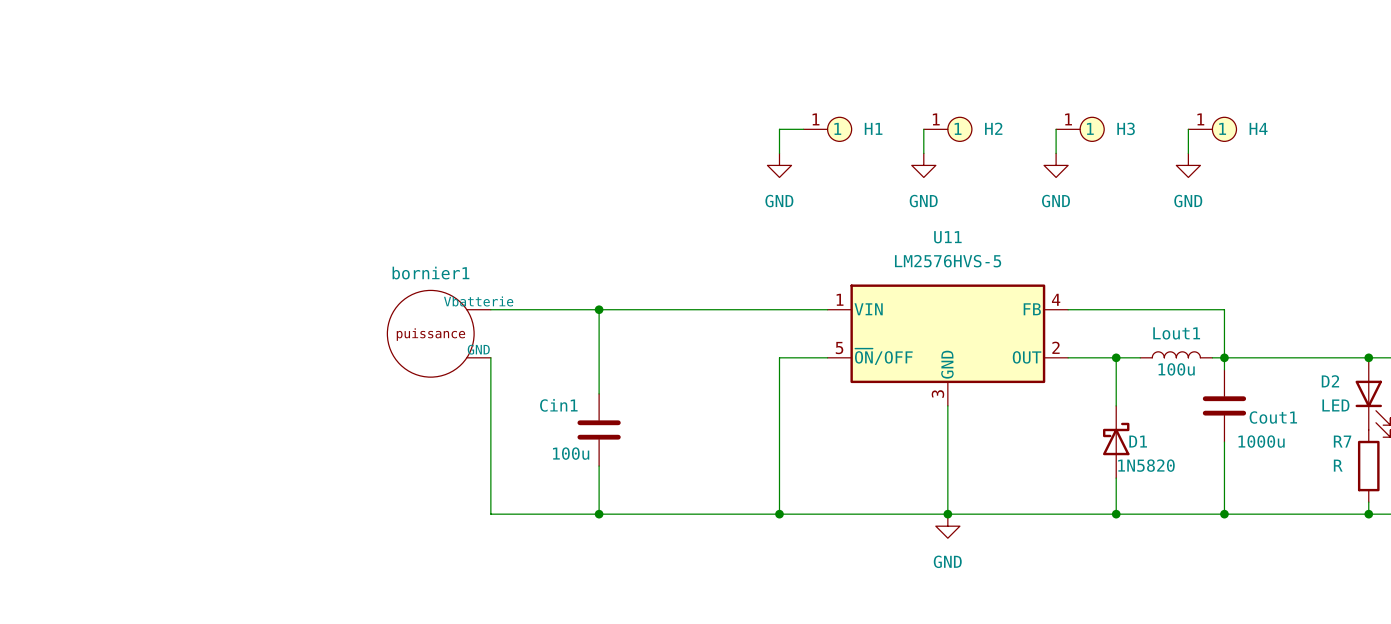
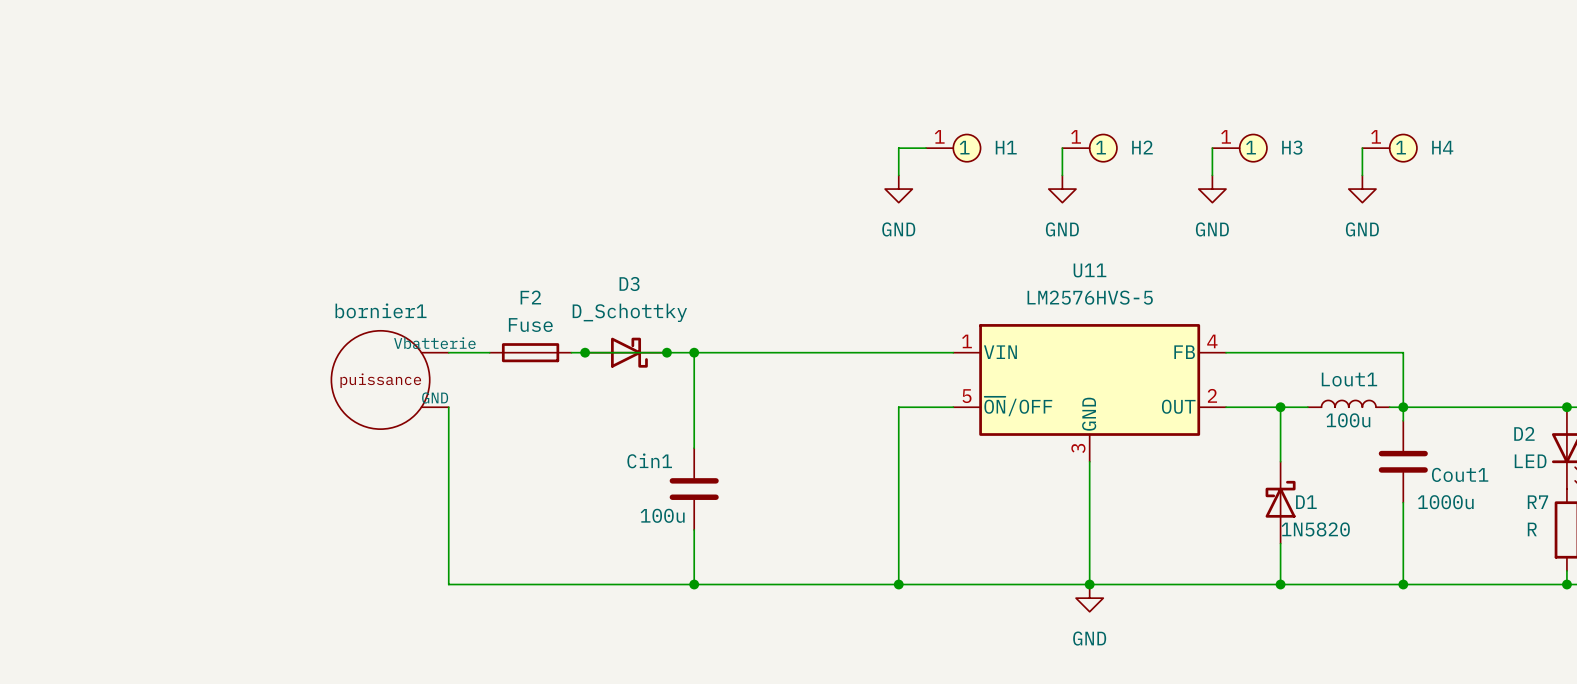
wire: none -> (448, 352) (489, 352)
F2: none -> Fuse (530, 352)
junction: none -> (585, 352)
D3: none -> D_Schottky (626, 352)
junction: none -> (666, 352)
bornier1 position: (439, 333) -> (390, 379)
wire: (490, 357) (490, 514) -> (448, 407) (448, 584) (571, 584)

